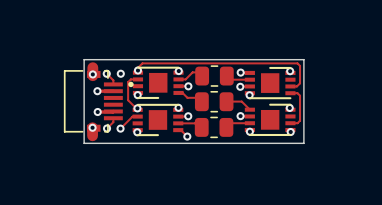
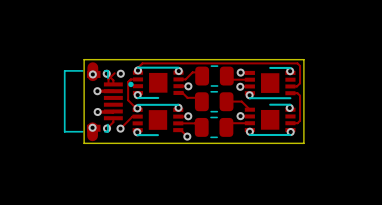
track: none -> (114, 73) (108, 79) (108, 84)

